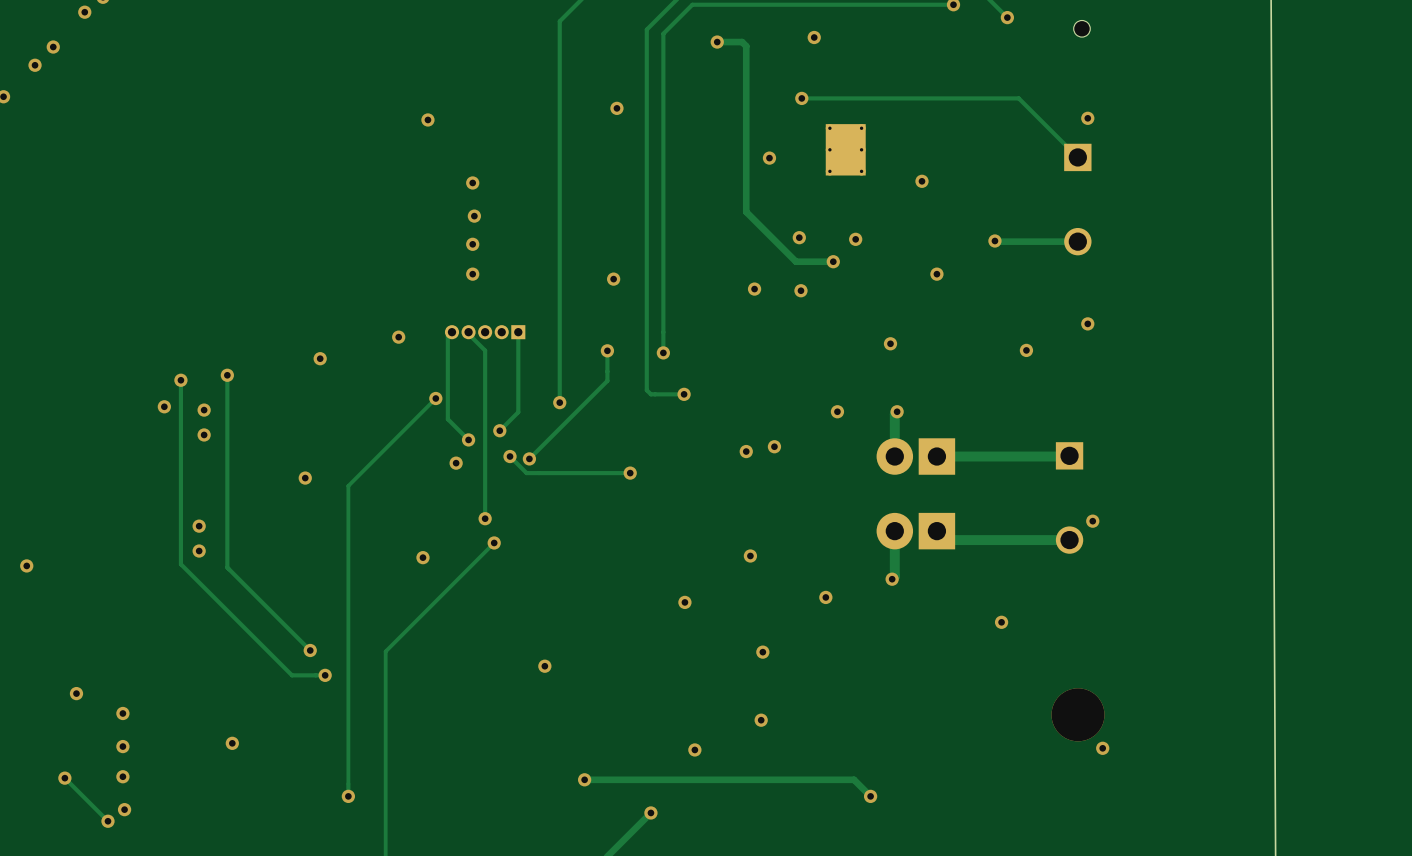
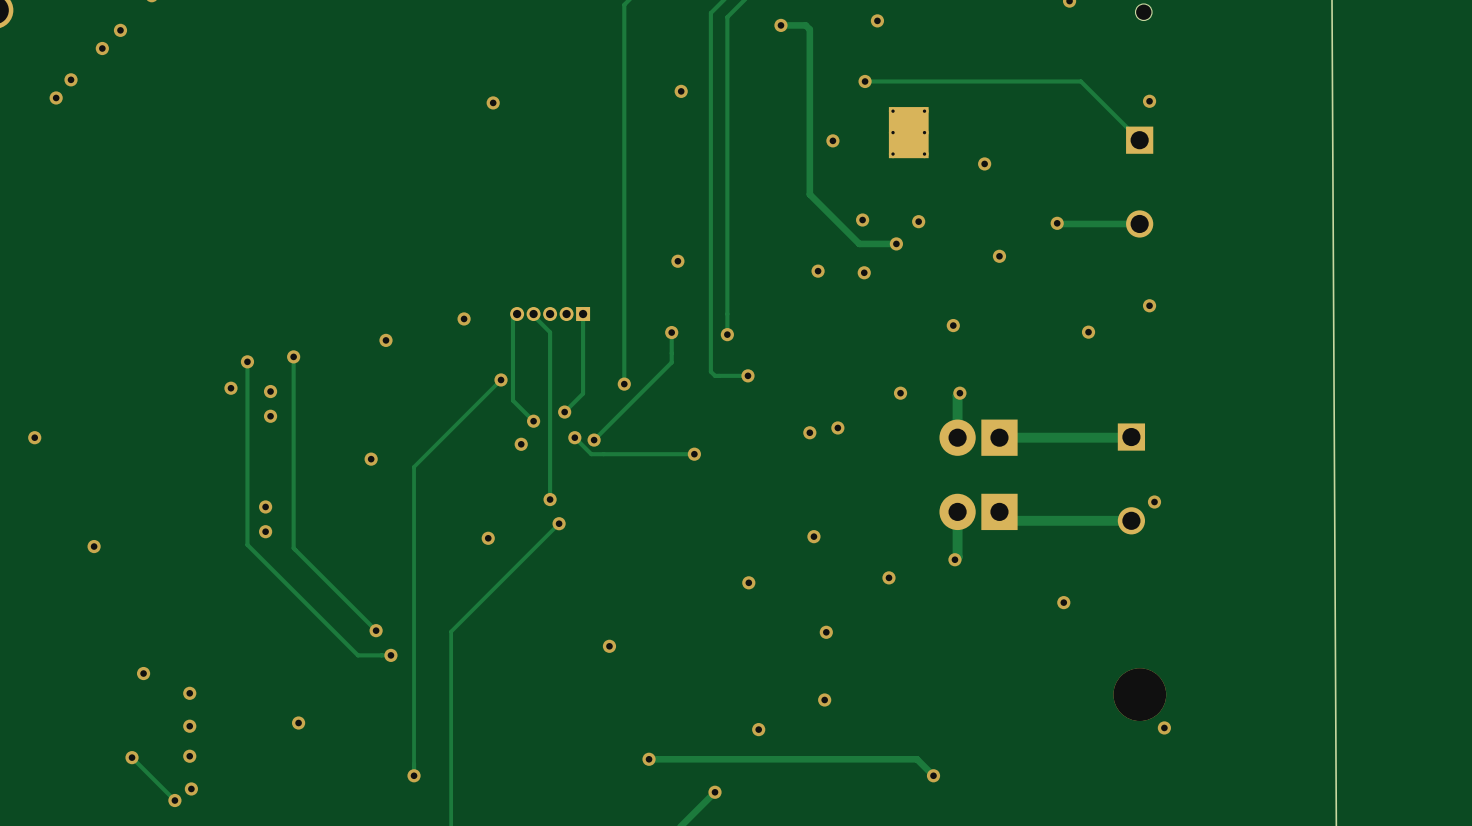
via: (472, 182) -> none
via: (474, 216) -> none
via: (472, 244) -> none
via: (472, 274) -> none

